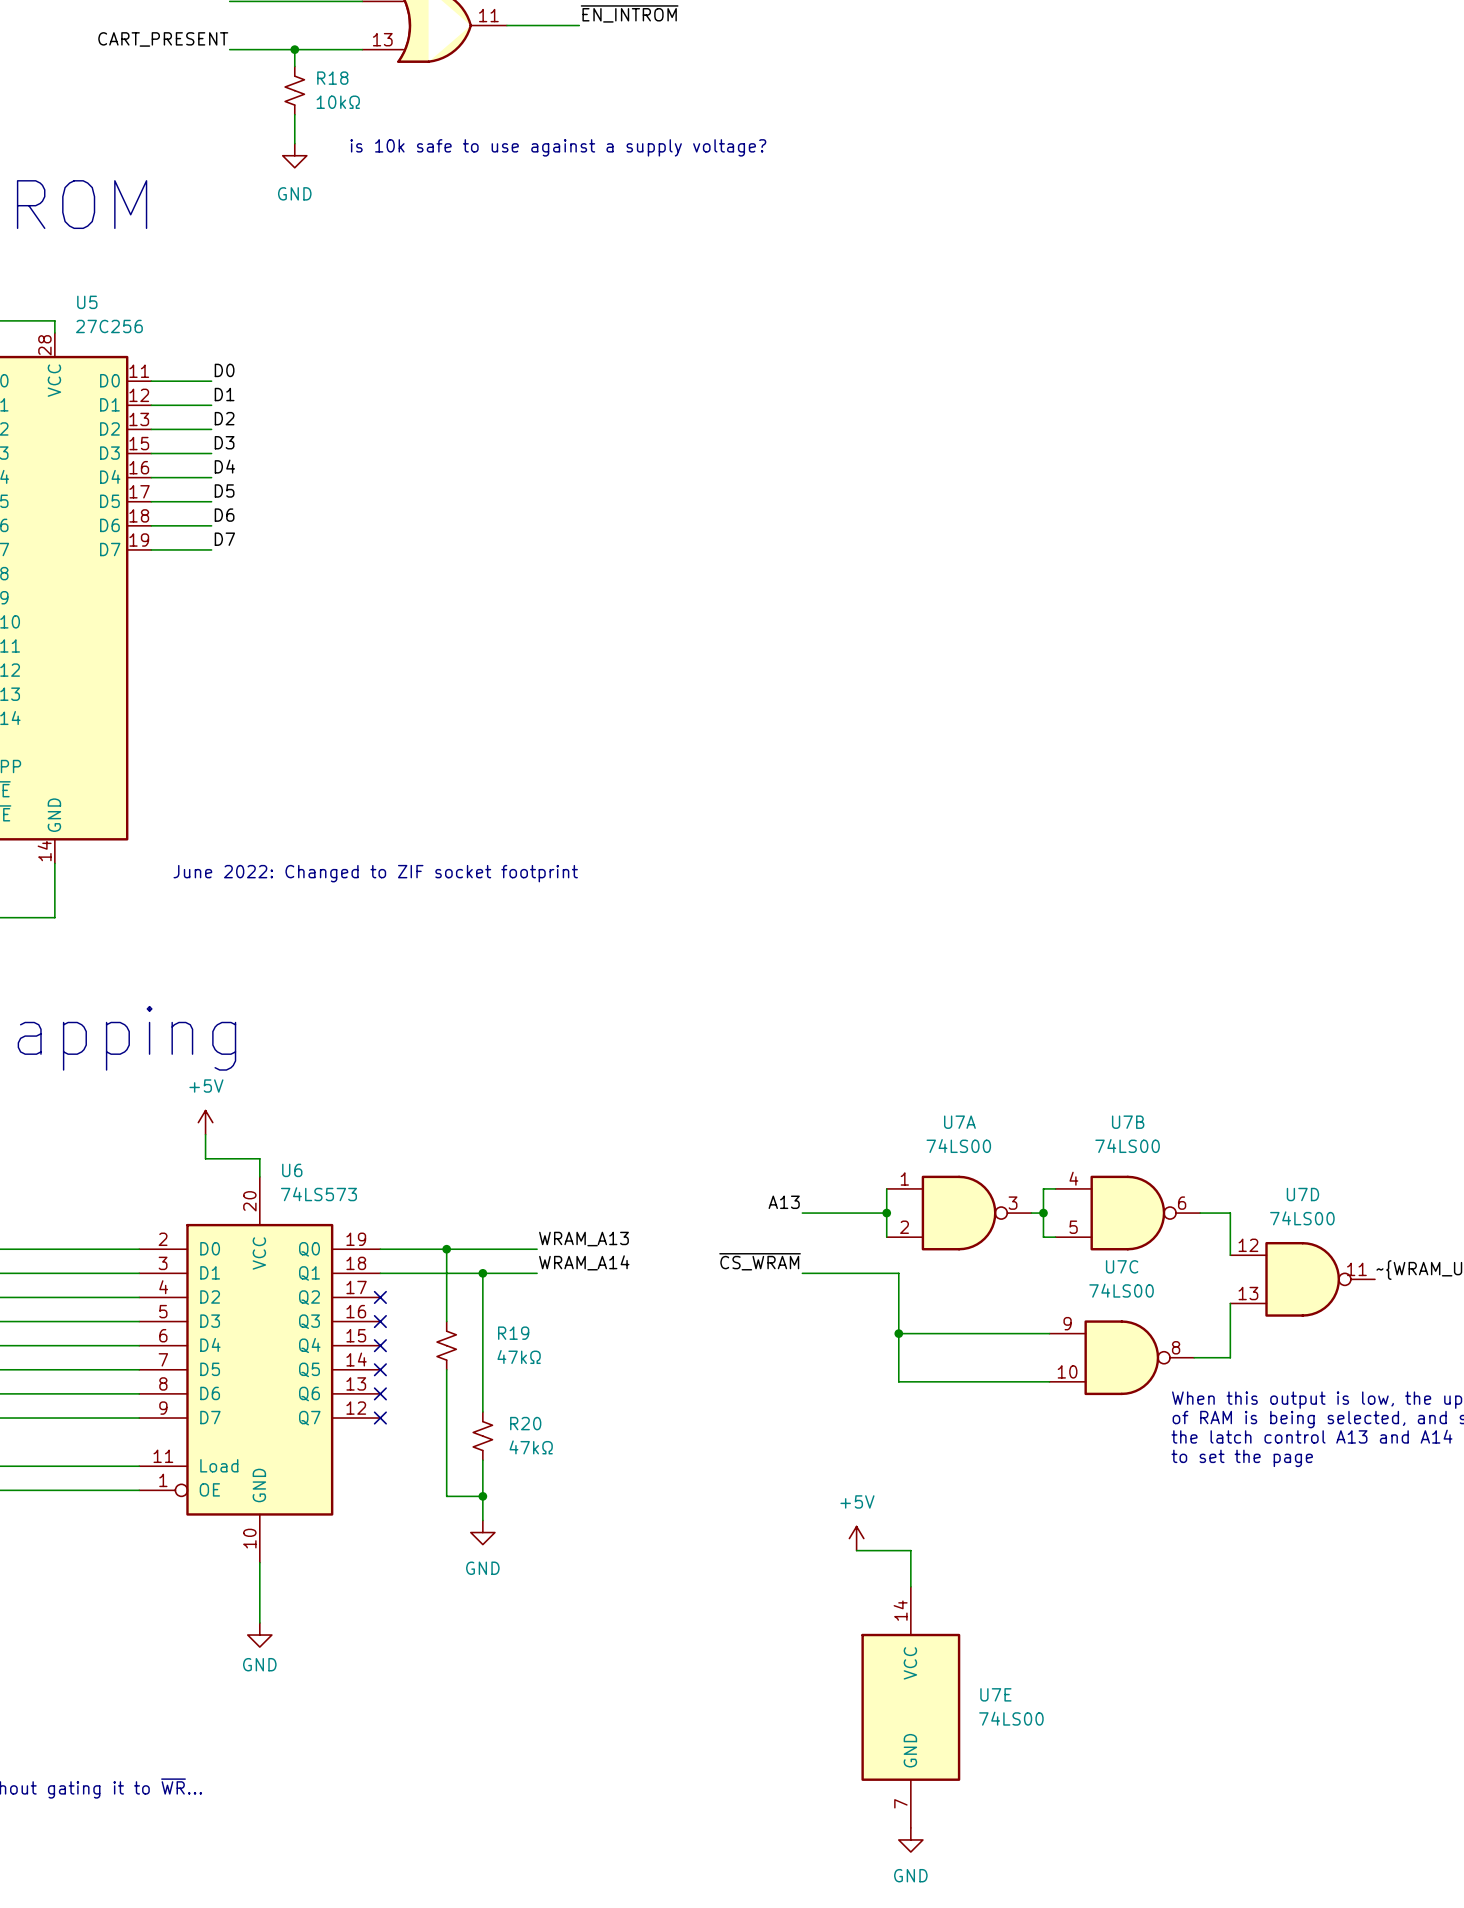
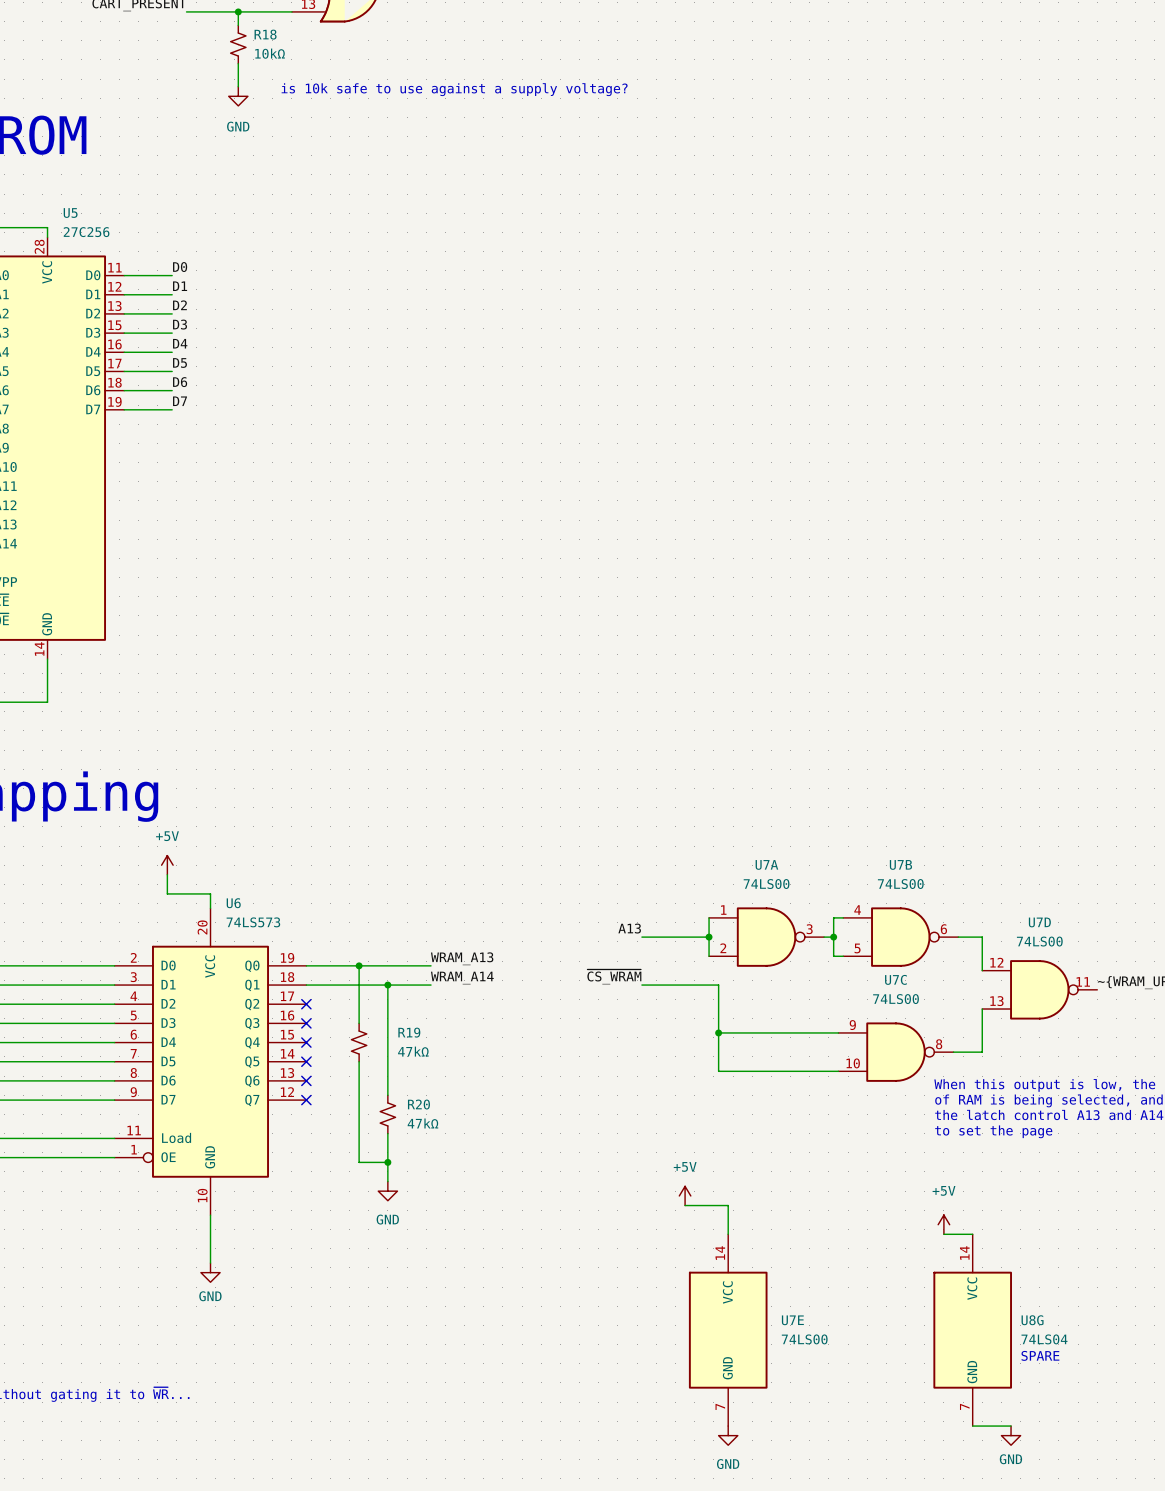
text: June 2022: Changed to ZIF socket footprint (375, 873) -> none
power symbol: none -> +5V (943, 1224)
wire: none -> (943, 1234) (972, 1234)
U8G: none -> 74LS04 (972, 1330)
text: none -> SPARE (1040, 1355)
wire: none -> (972, 1426) (1011, 1426)
power symbol: none -> GND (1011, 1435)

